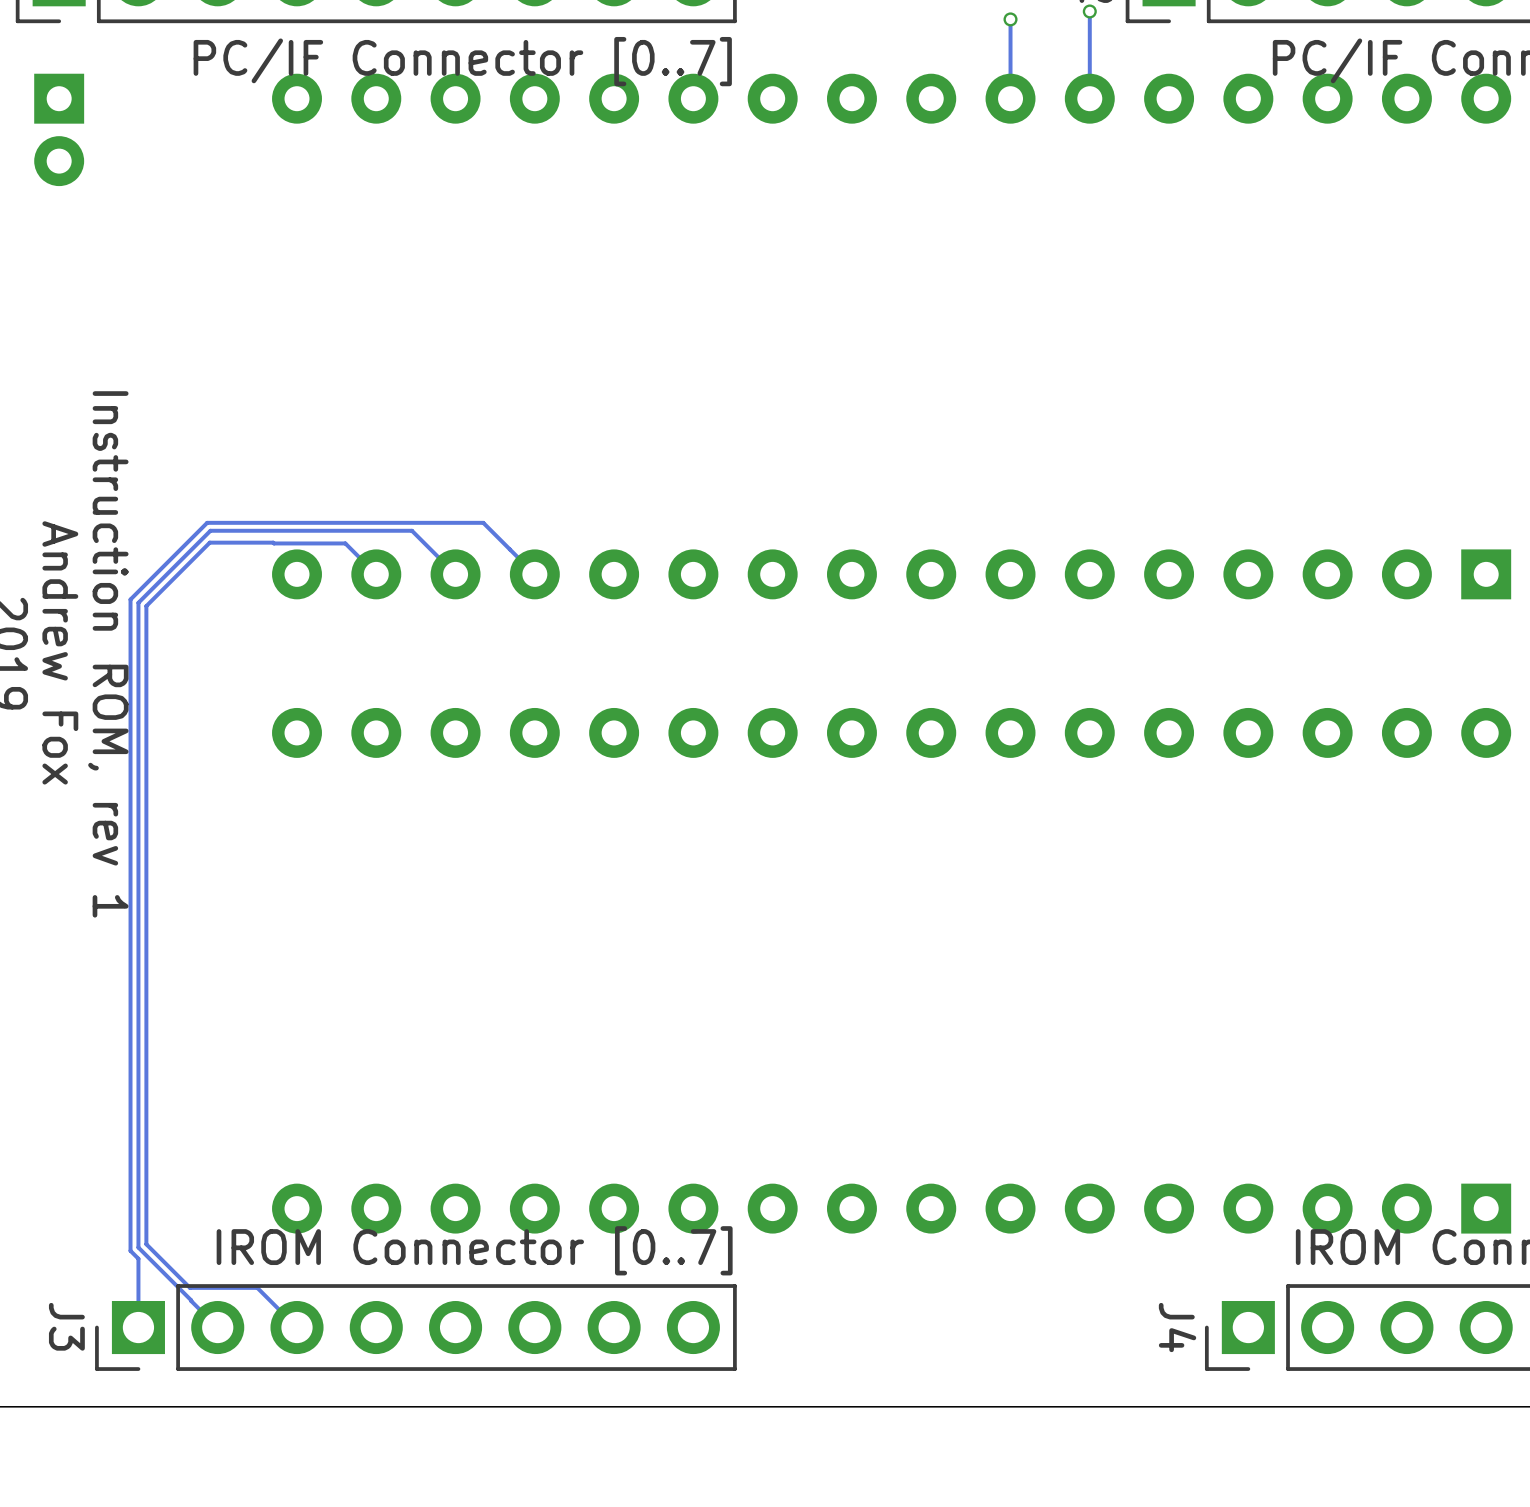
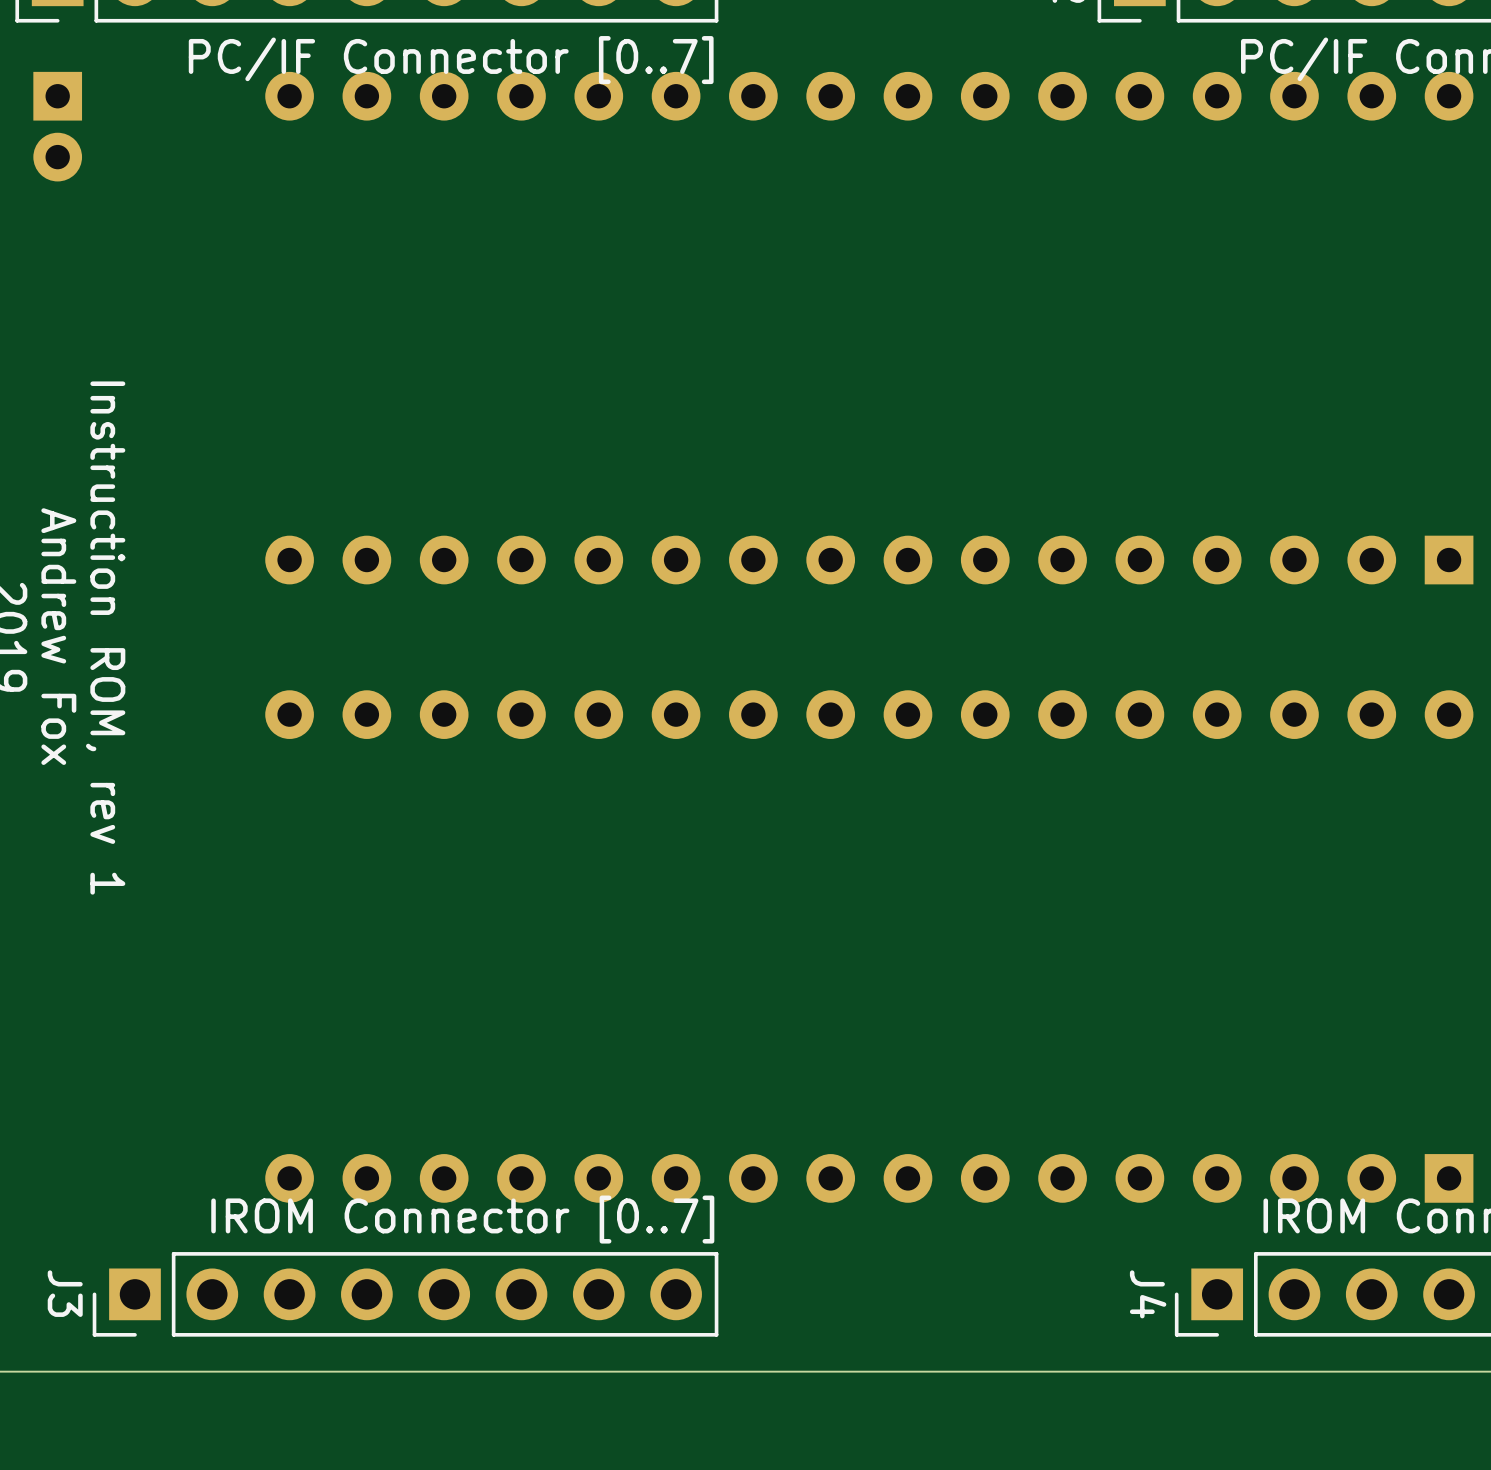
track: (1089, 11) (1089, 98) -> none
via: (1089, 11) -> none
track: (1010, 19) (1010, 98) -> none
via: (1010, 19) -> none
track: (376, 574) (345, 543) (209, 542) (146, 606) (146, 1244) (189, 1287) (257, 1287) (297, 1327) -> none
track: (455, 574) (411, 530) (210, 530) (138, 602) (138, 1247) (217, 1327) -> none
track: (534, 574) (483, 522) (207, 522) (130, 599) (130, 1250) (138, 1258) (138, 1327) -> none

